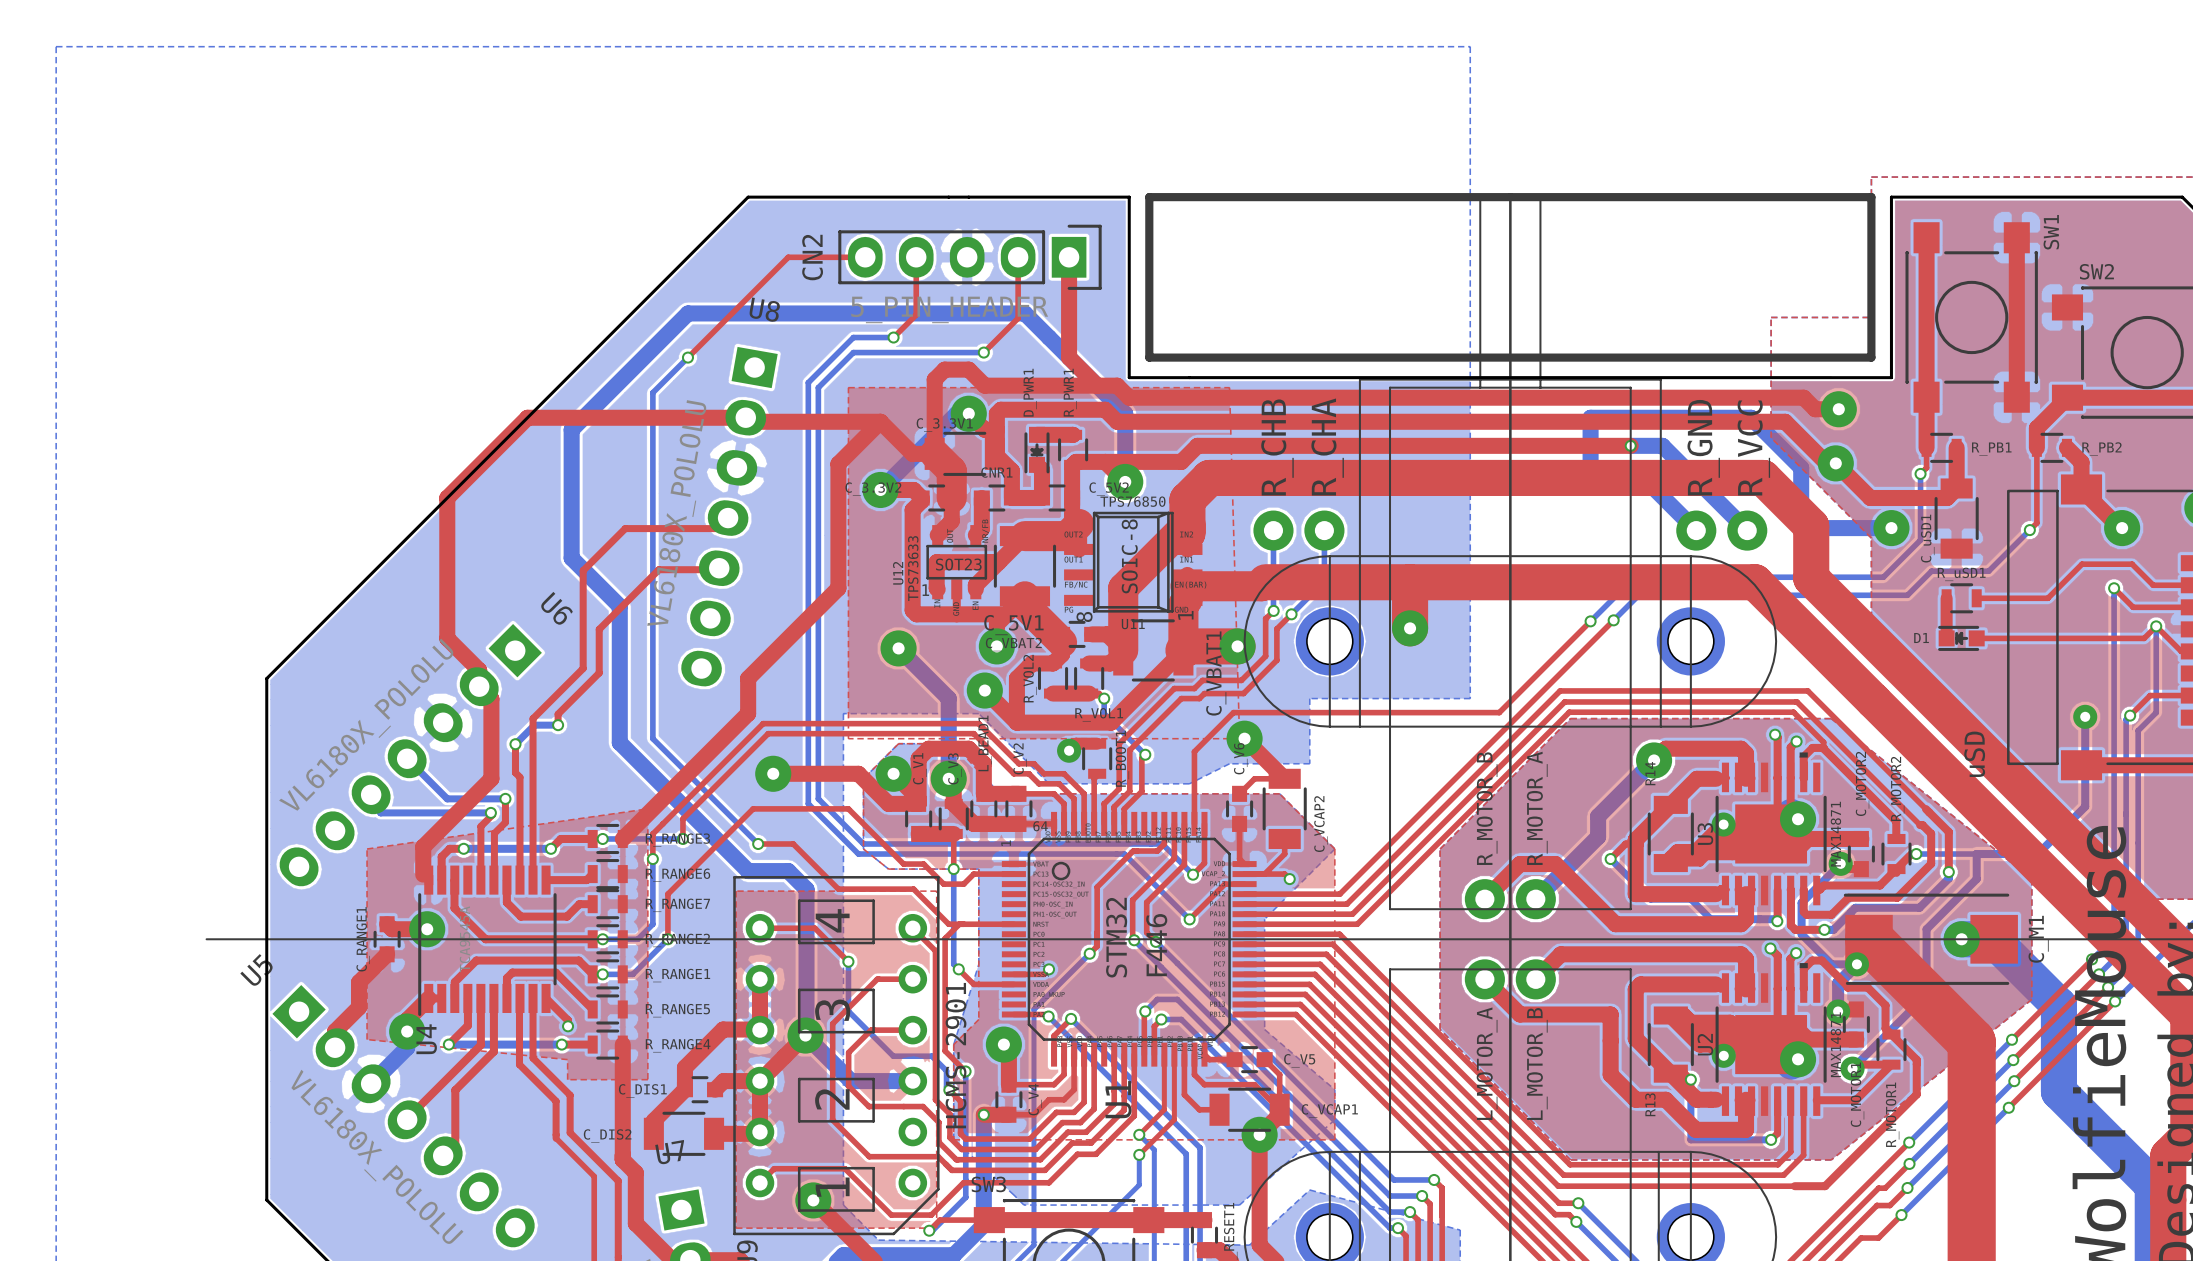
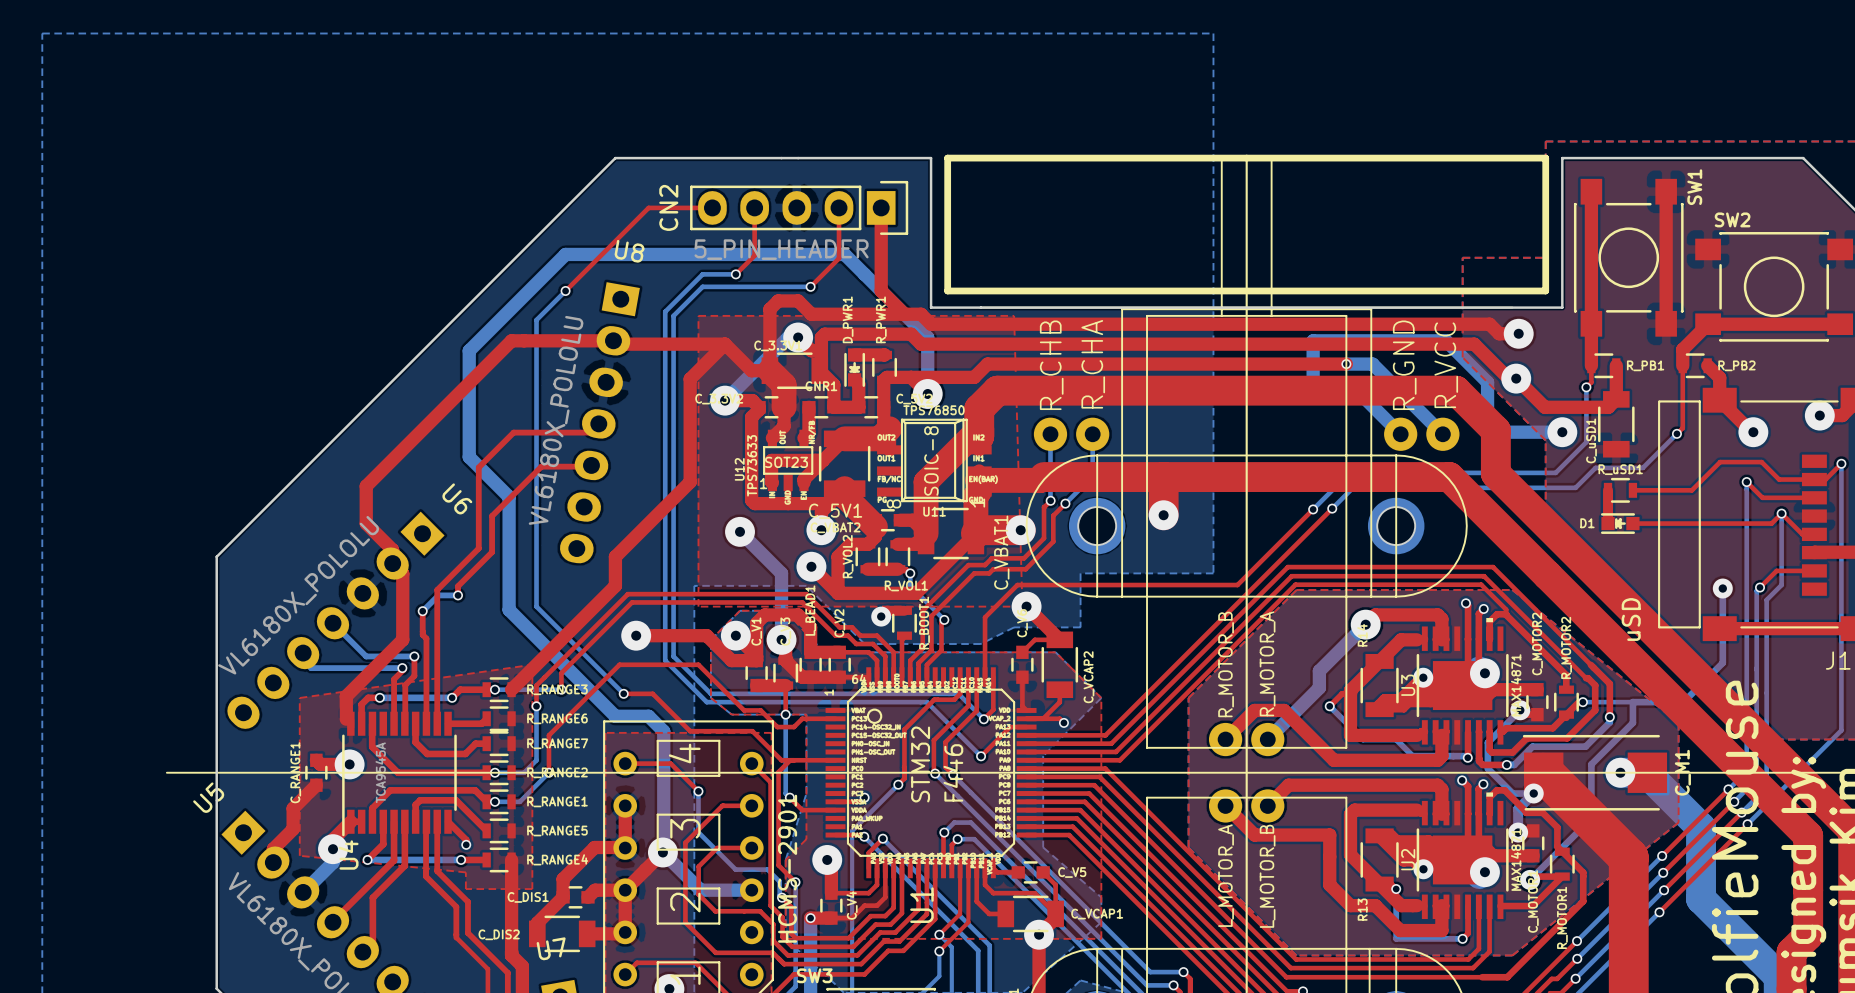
top track: (622, 417) (527, 417) (447, 497) (447, 593) -> (511, 340) (366, 486)

